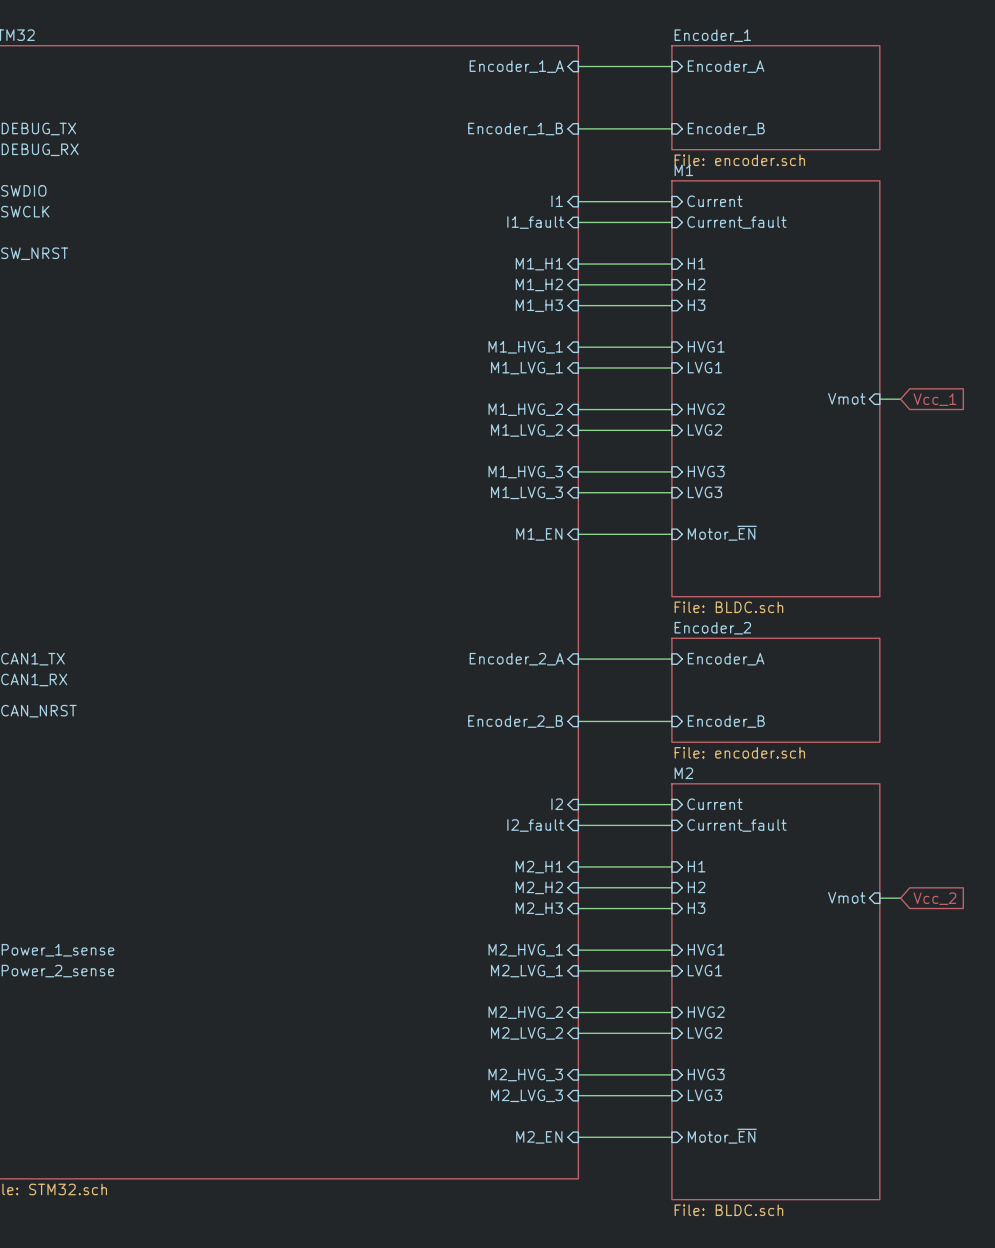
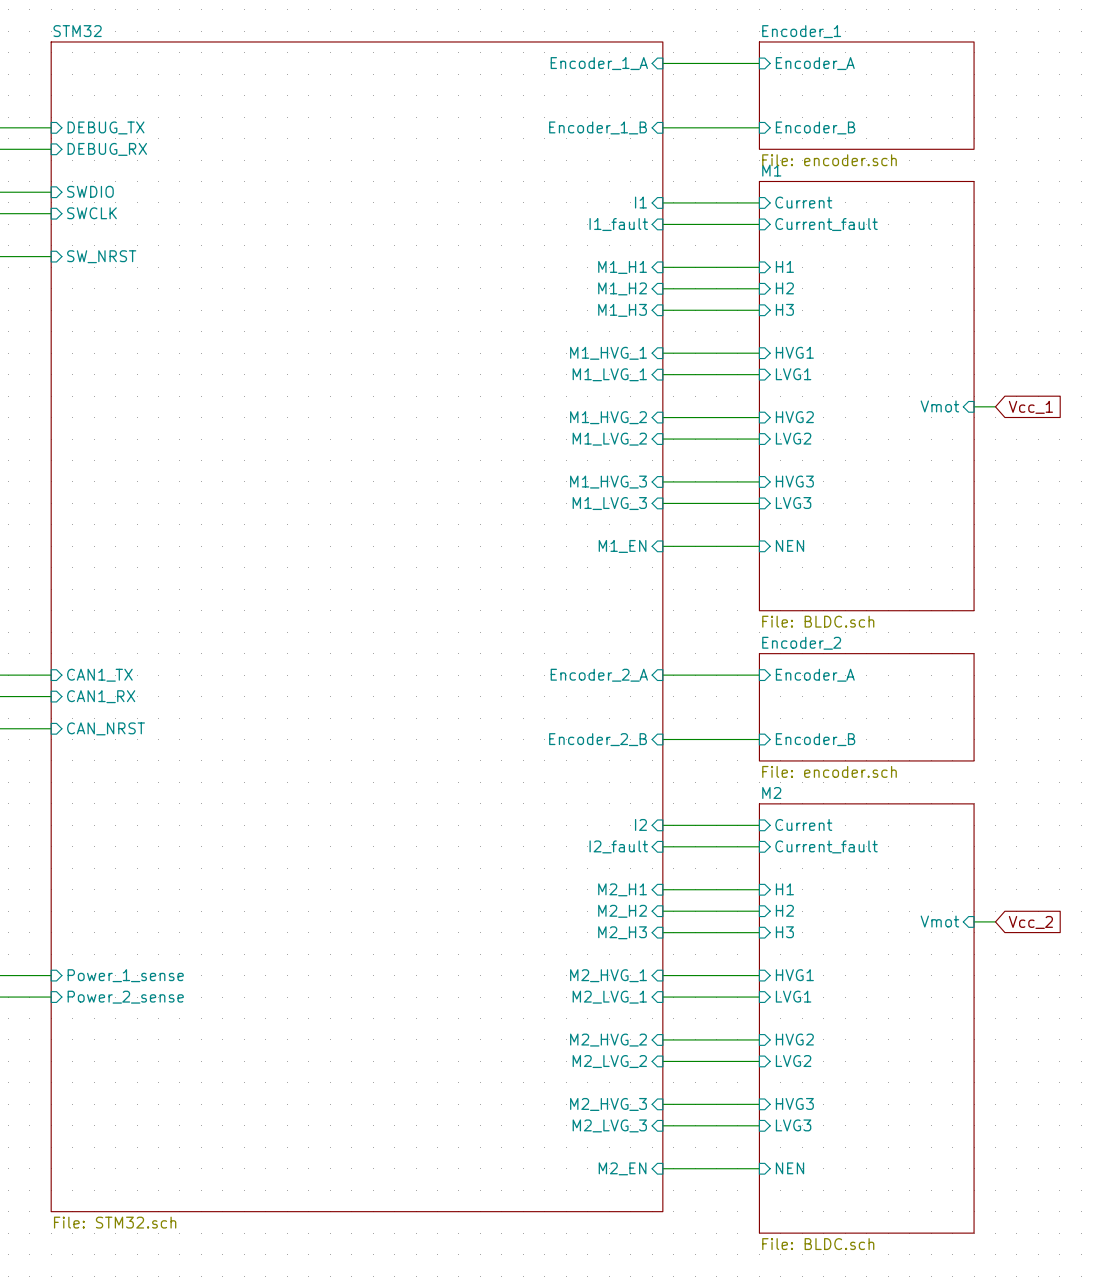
sheet pin: Motor_~{EN} (722, 533) -> NEN (789, 545)
sheet pin: Motor_~{EN} (722, 1136) -> NEN (789, 1168)

